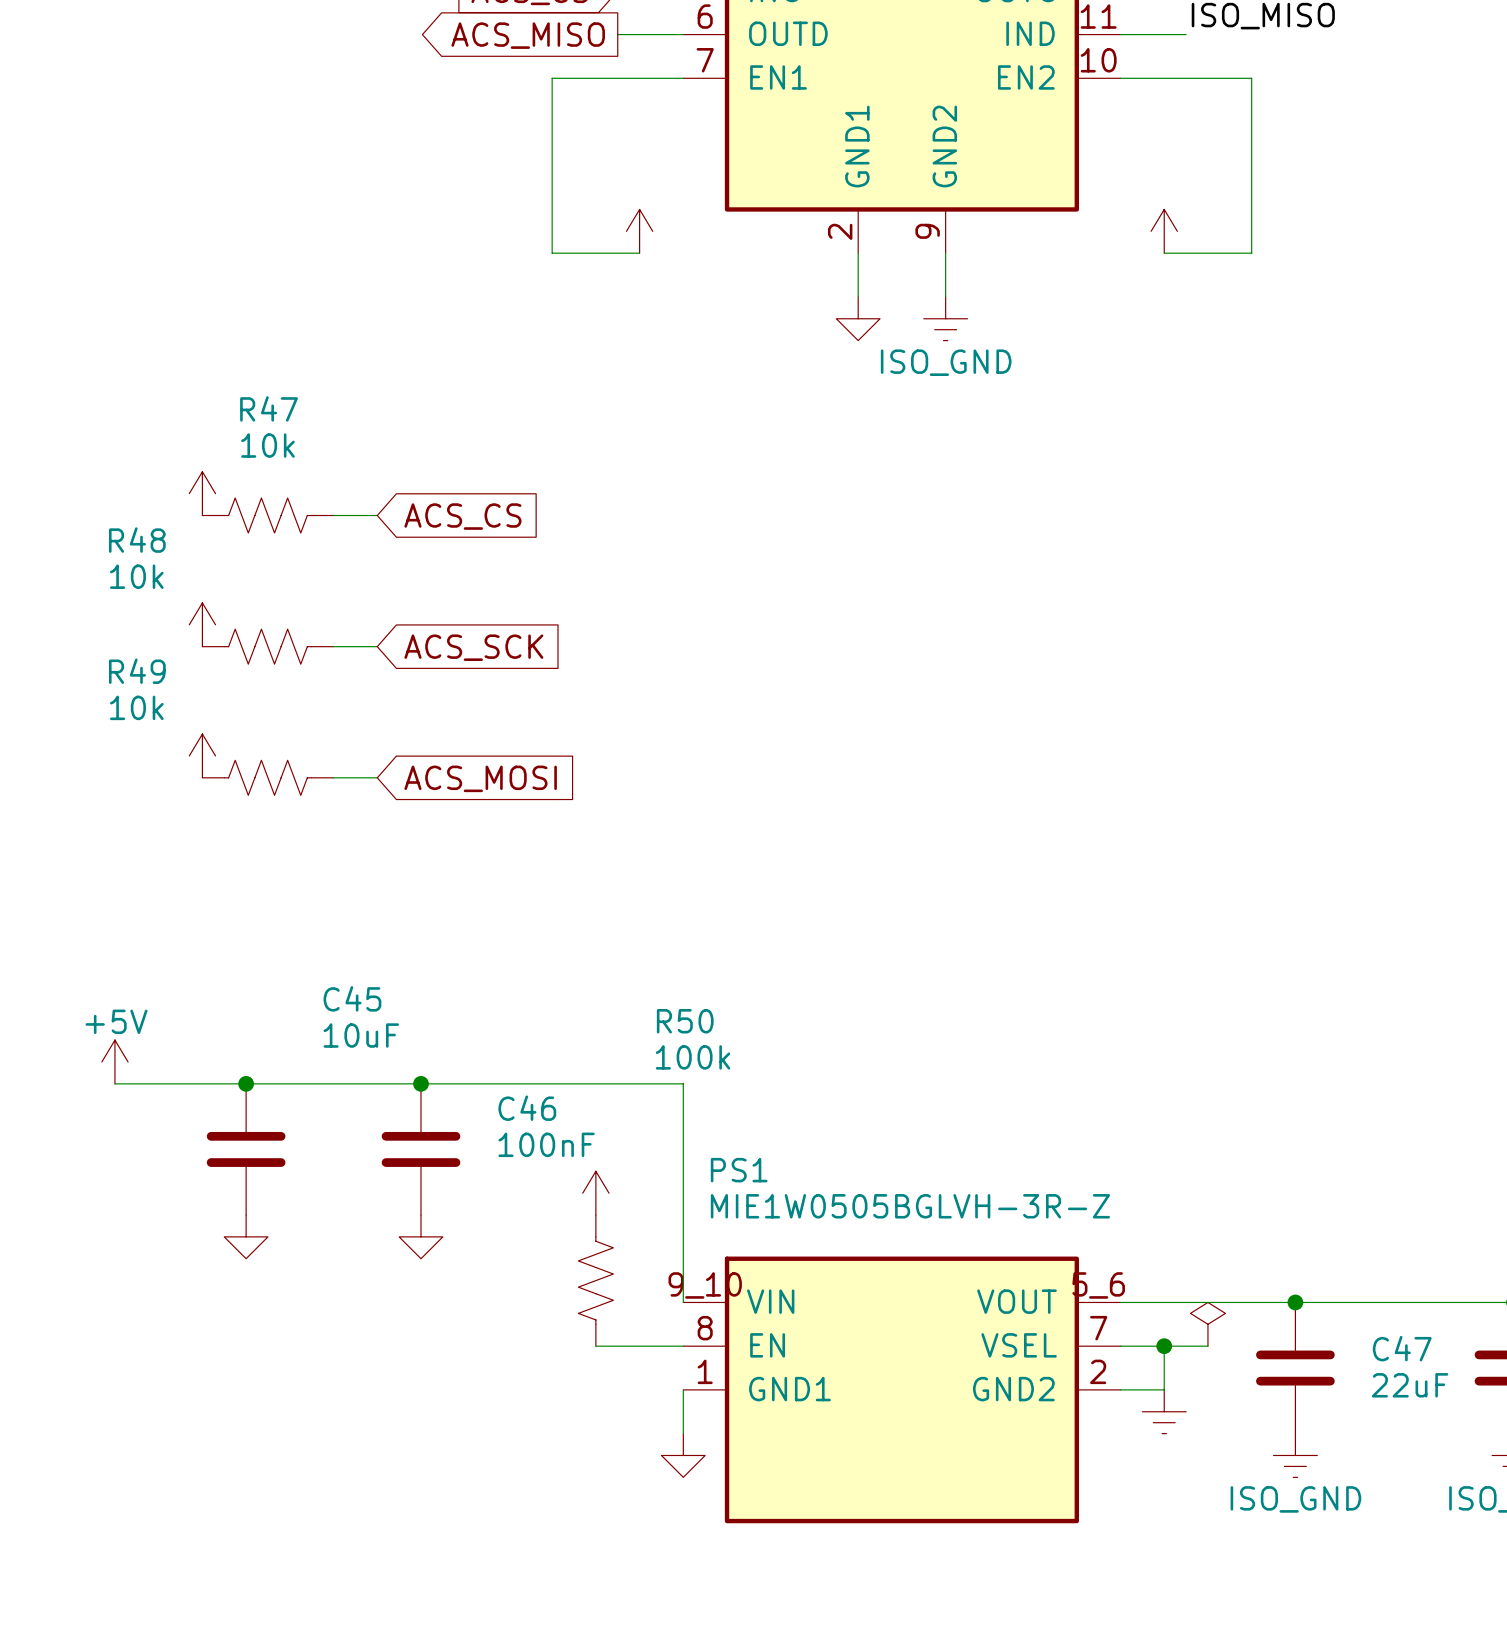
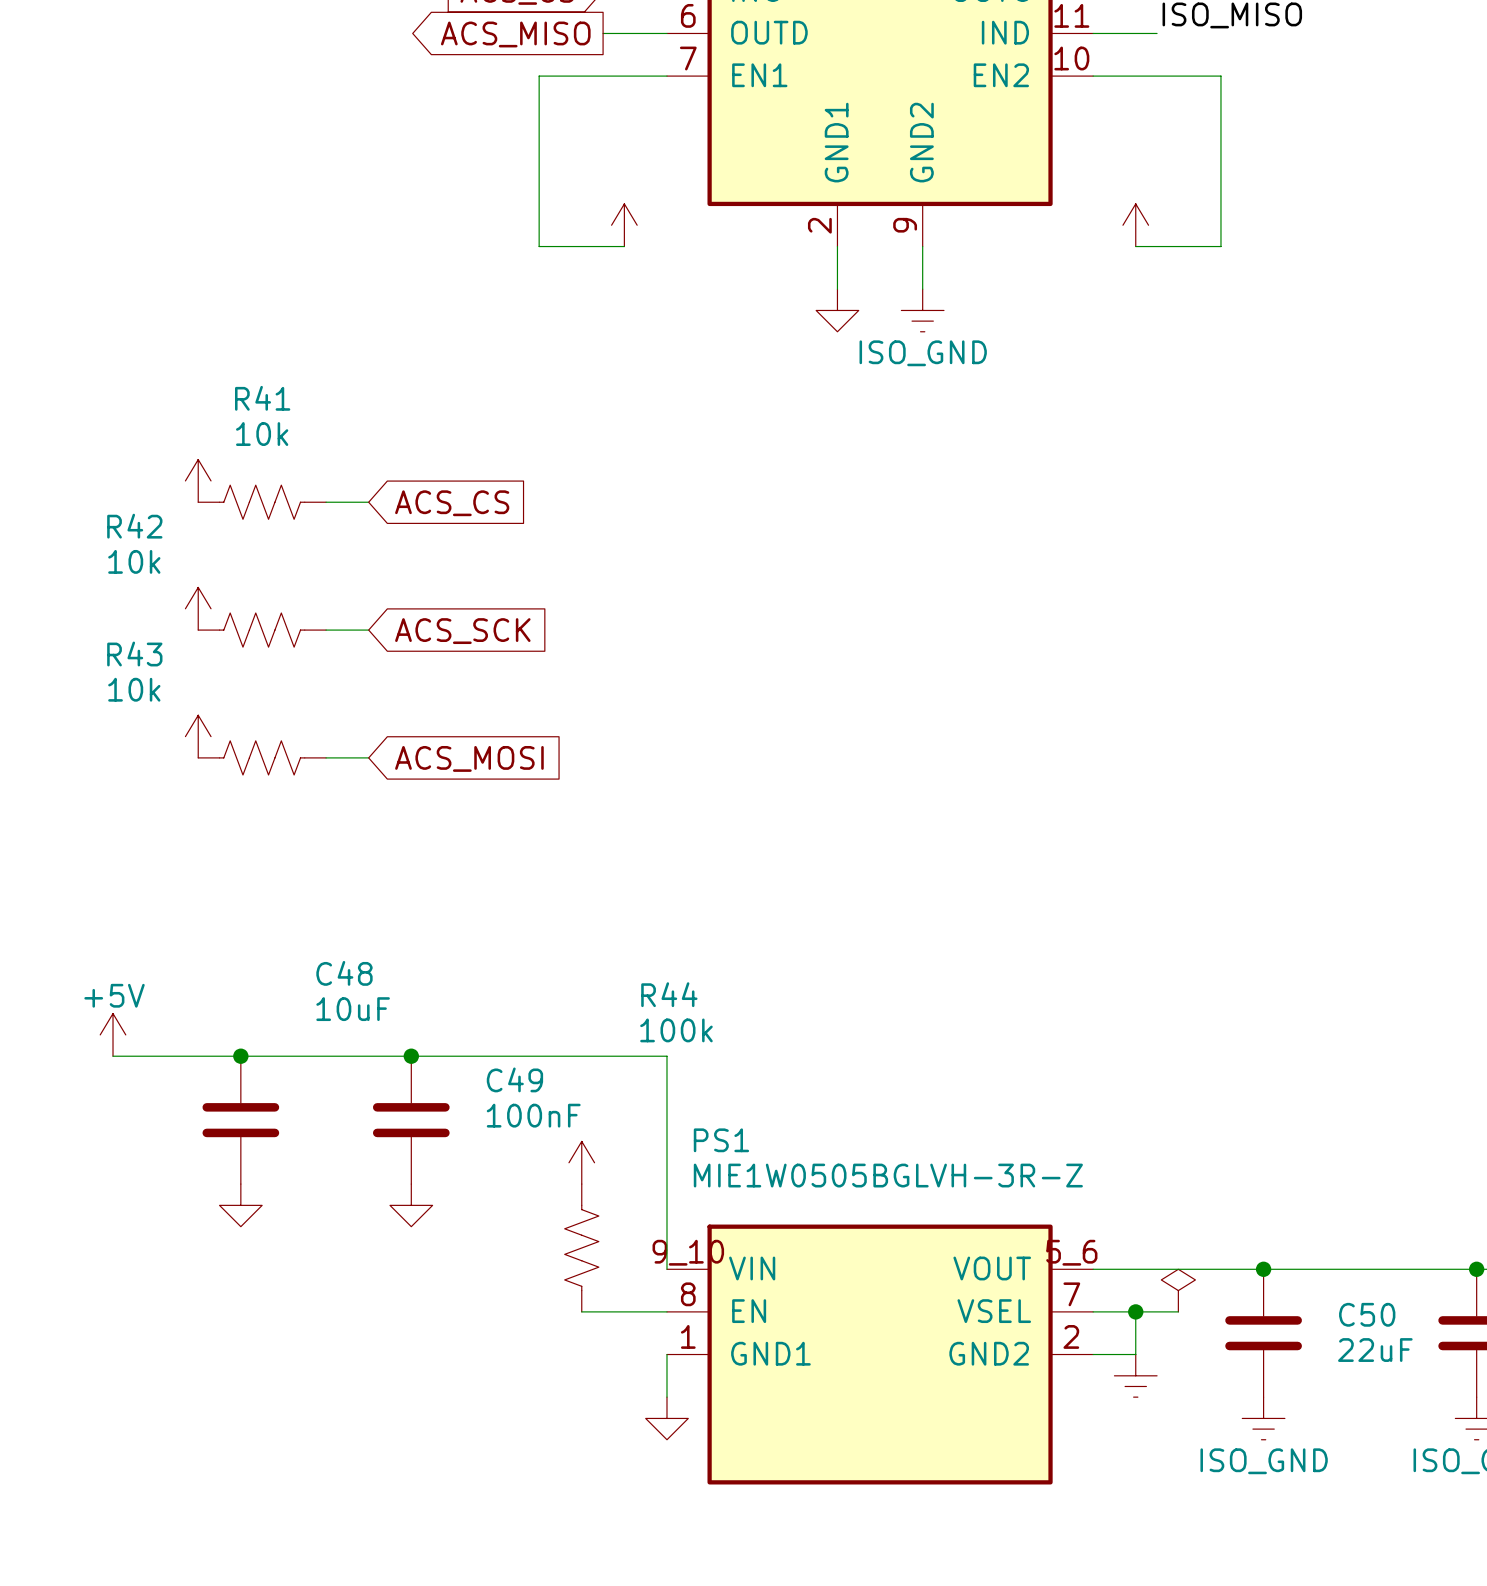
R47 name: R47 (269, 408) -> R41 (262, 398)
R48 name: R48 (137, 540) -> R42 (134, 526)
R49 name: R49 (137, 671) -> R43 (134, 654)
C45 name: C45 (352, 998) -> C48 (344, 973)
R50 name: R50 (685, 1021) -> R44 (669, 994)
C46 name: C46 (527, 1108) -> C49 (514, 1079)
C47 name: C47 (1402, 1348) -> C50 (1367, 1314)

